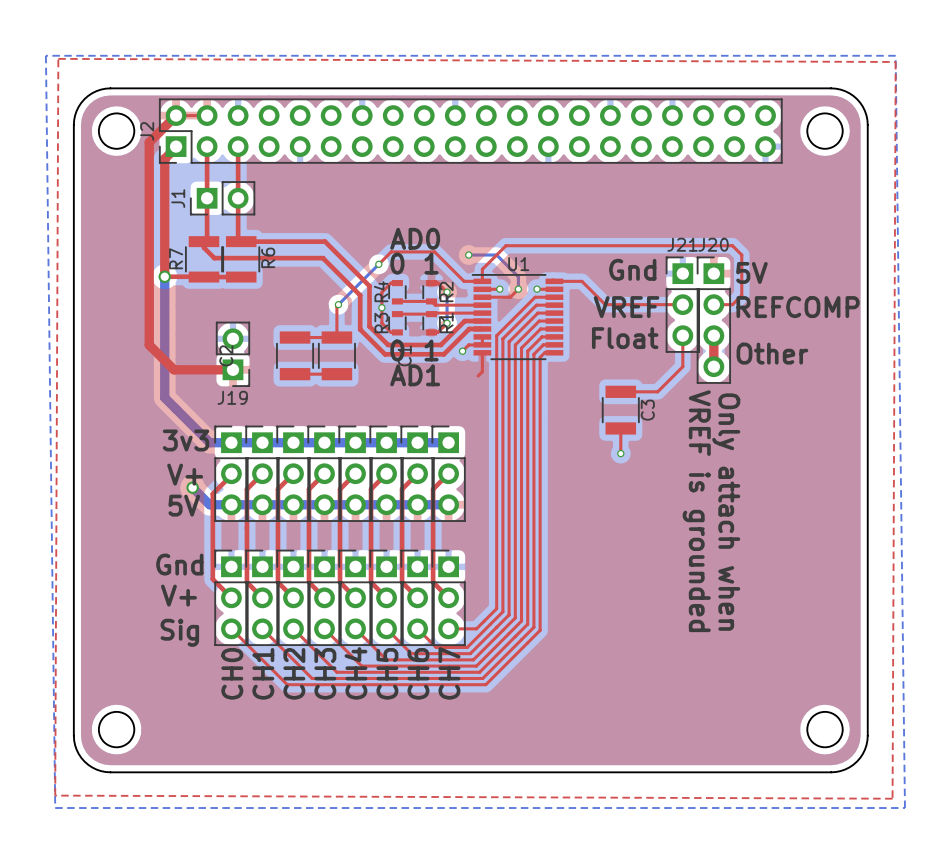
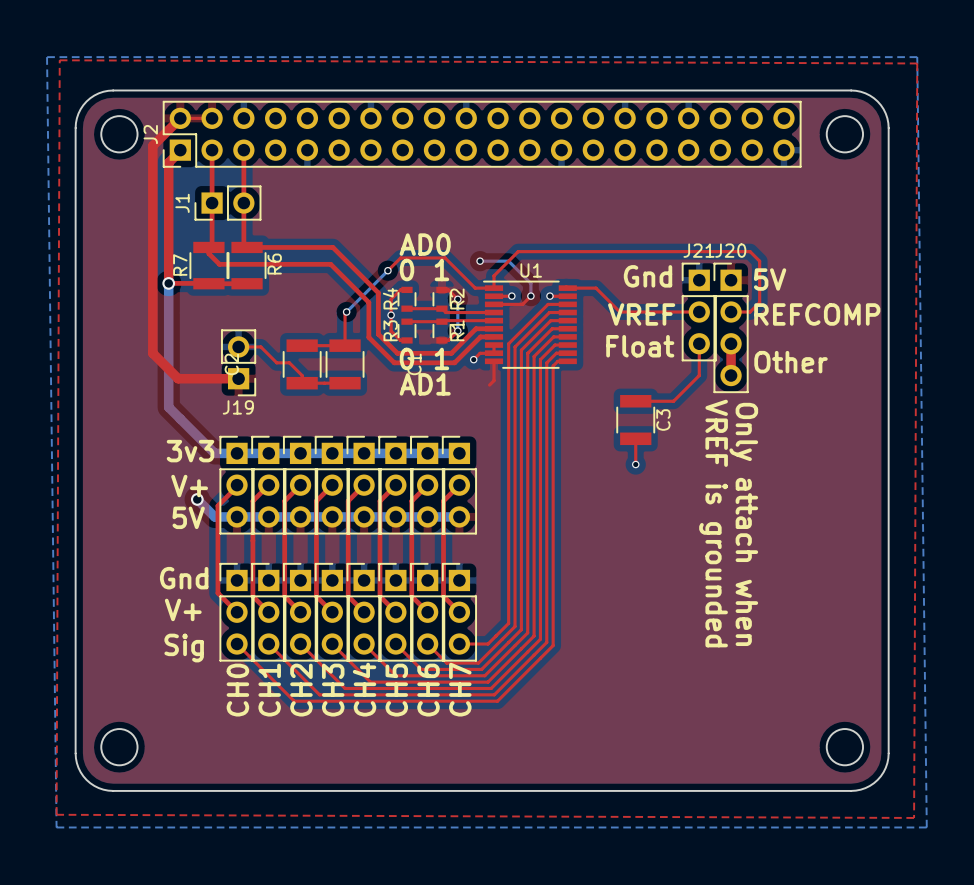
top track: none -> (238, 346) (260, 346) (276, 362) (289, 362) (302, 375) (302, 383)

